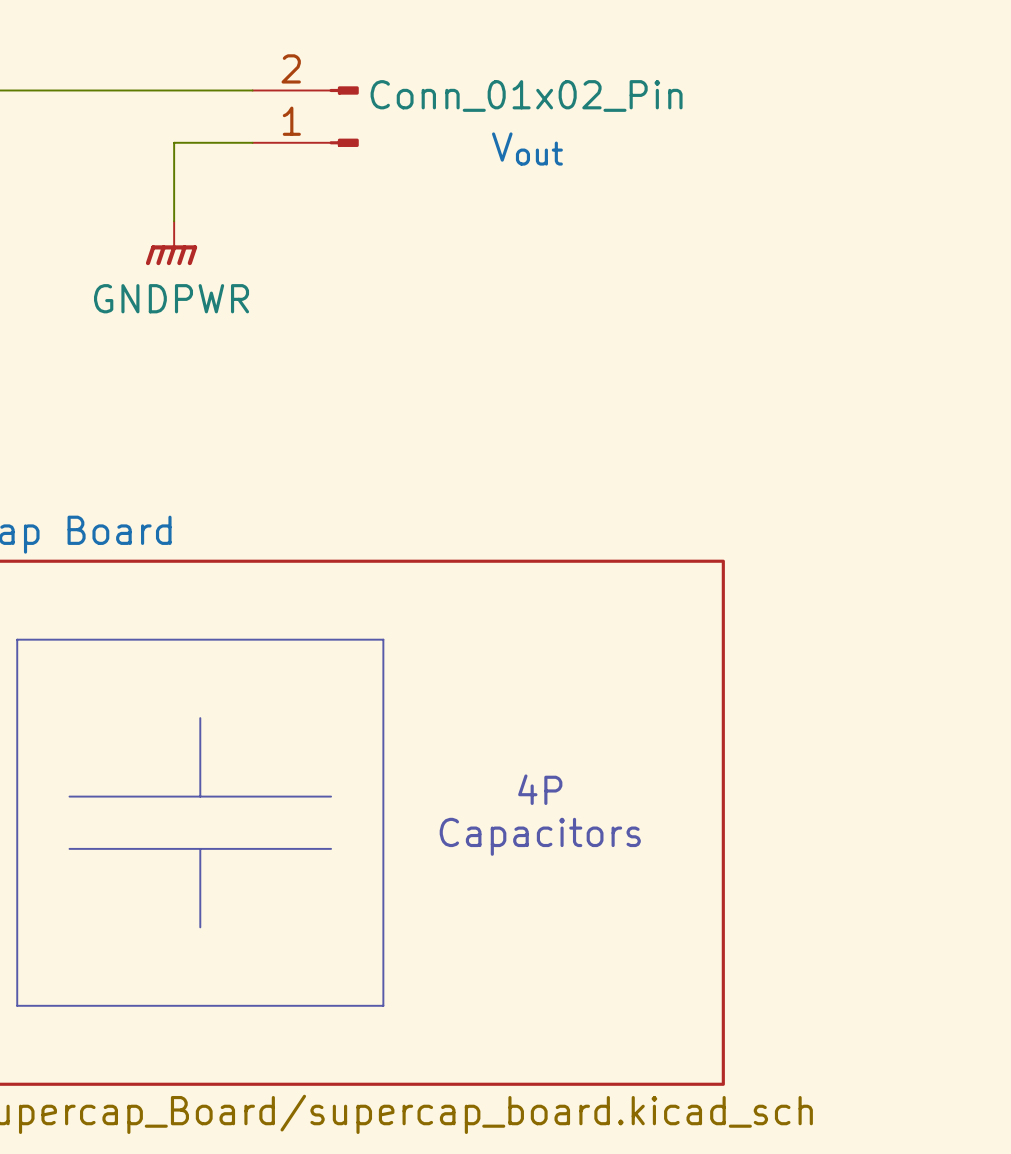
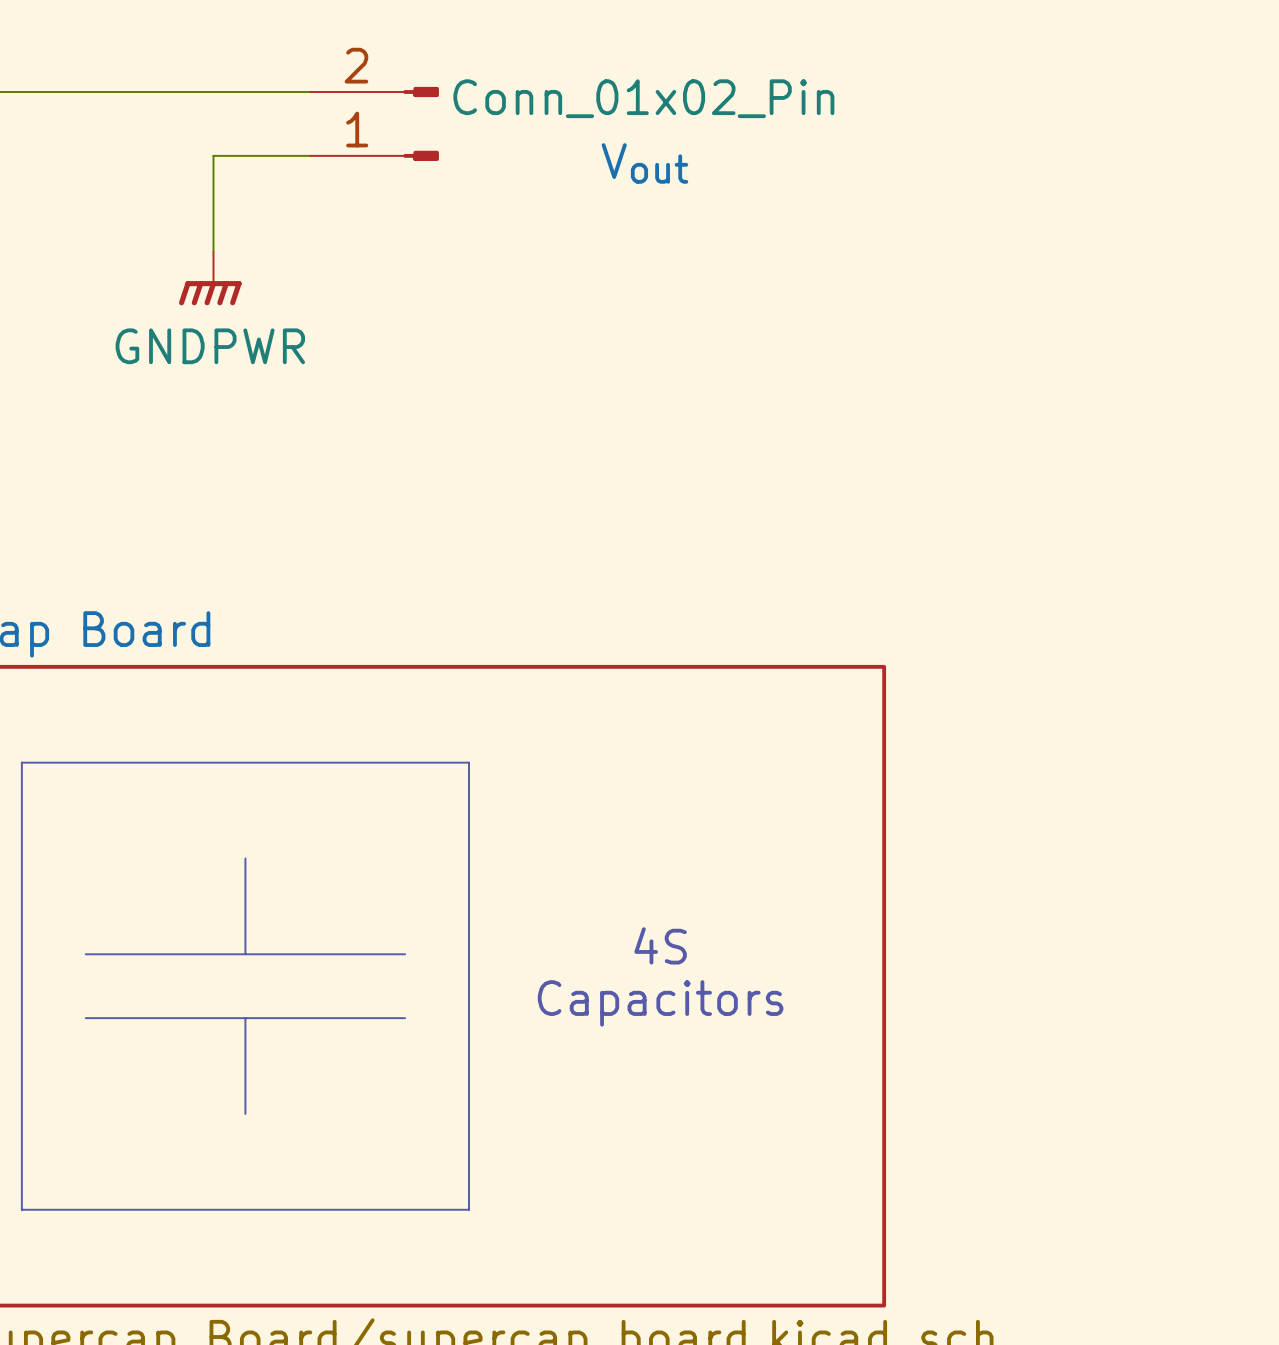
text: 4P (540, 789) -> 4S (660, 945)

